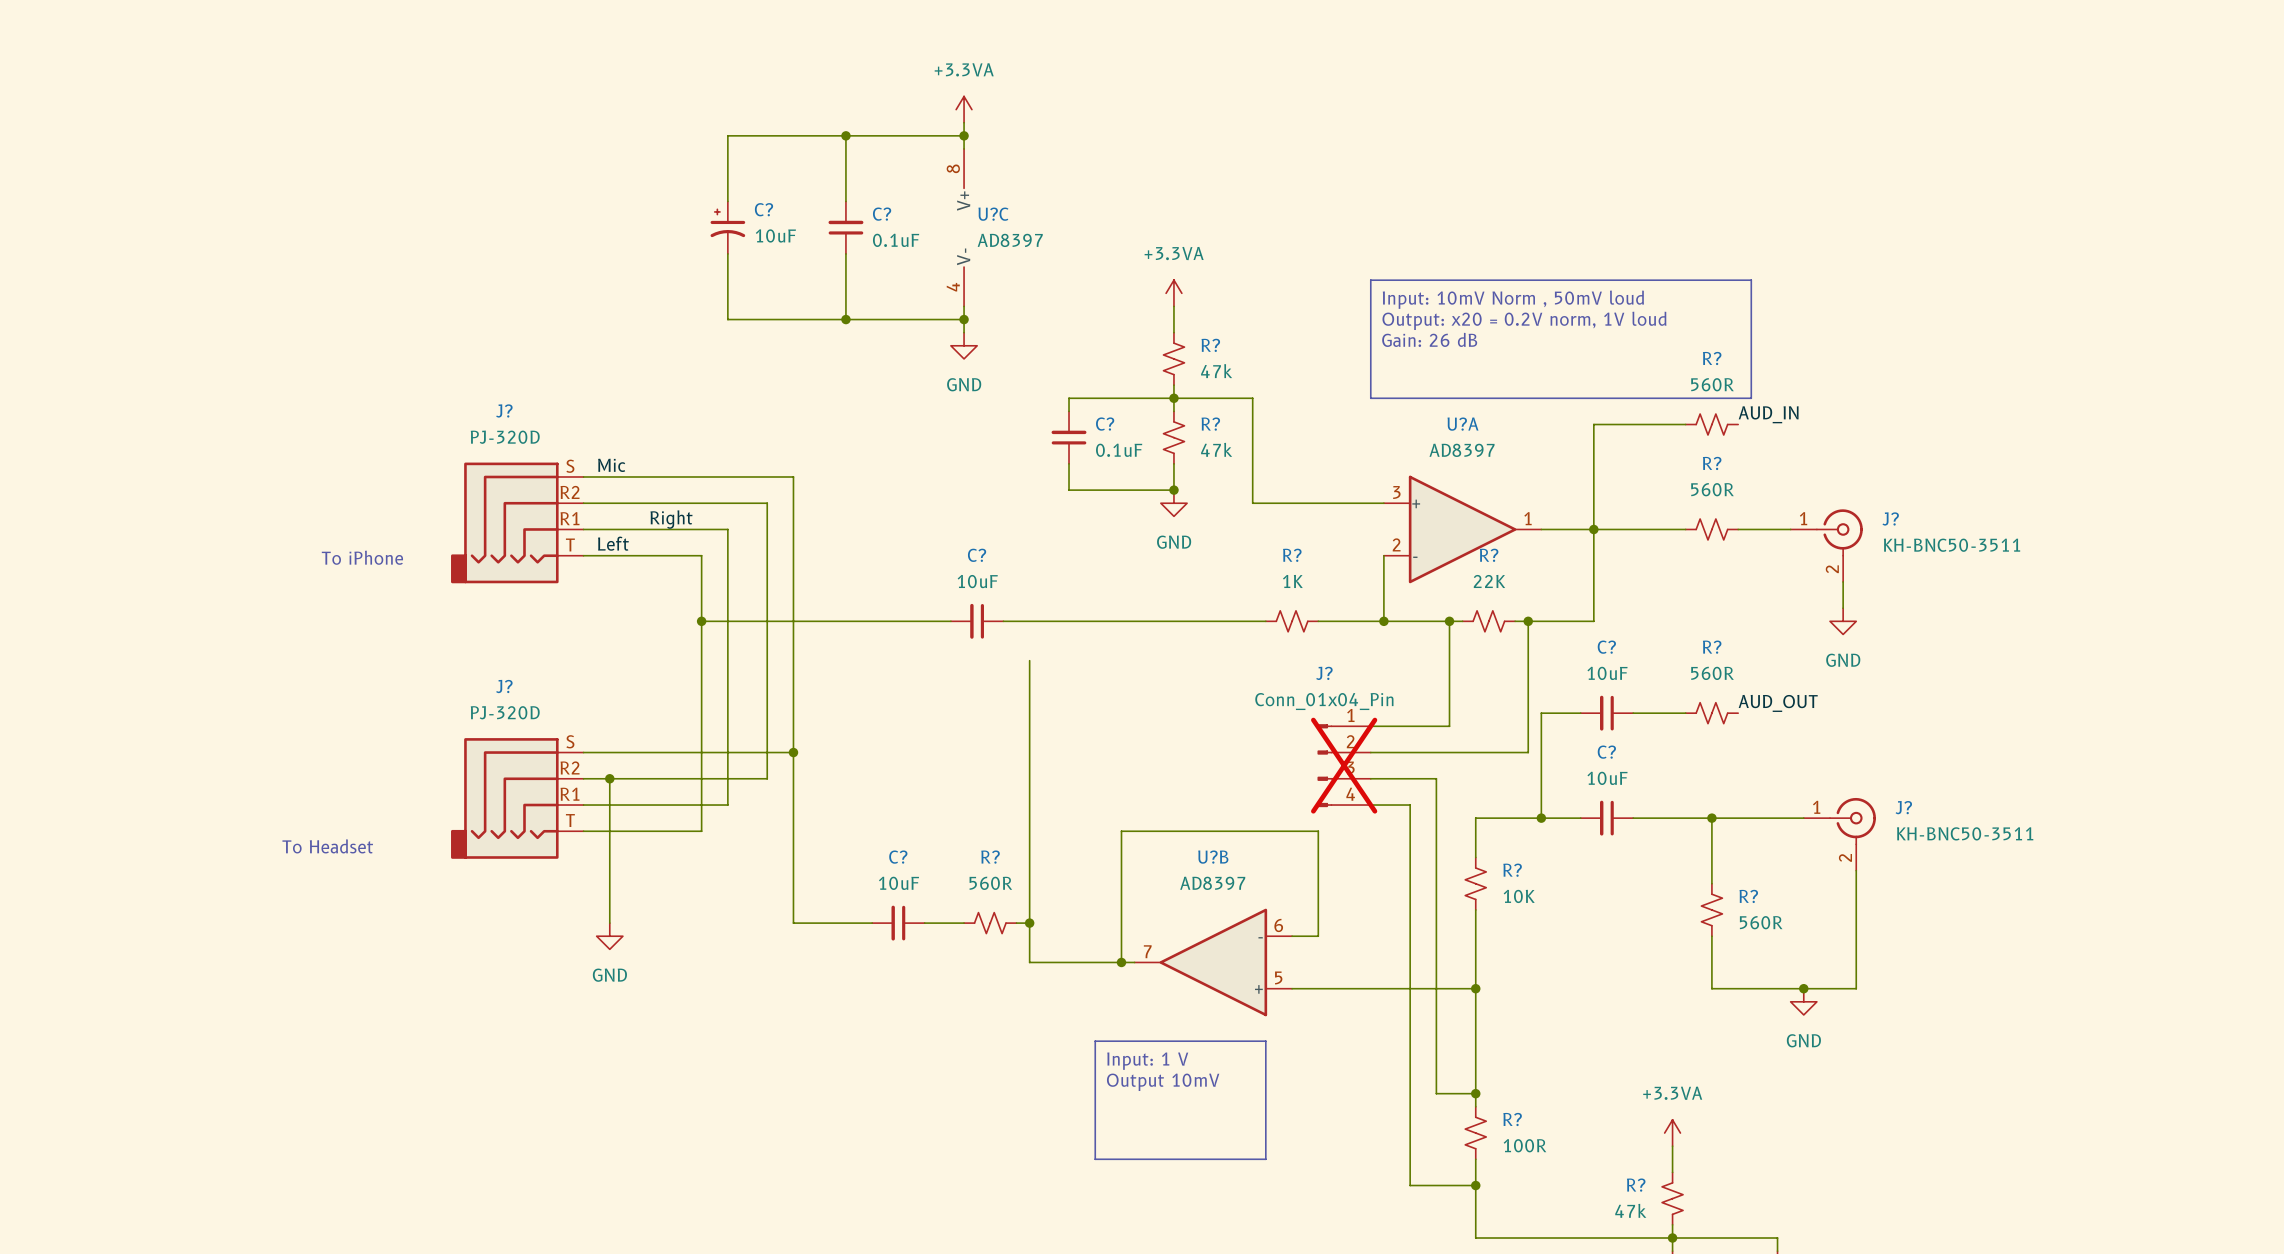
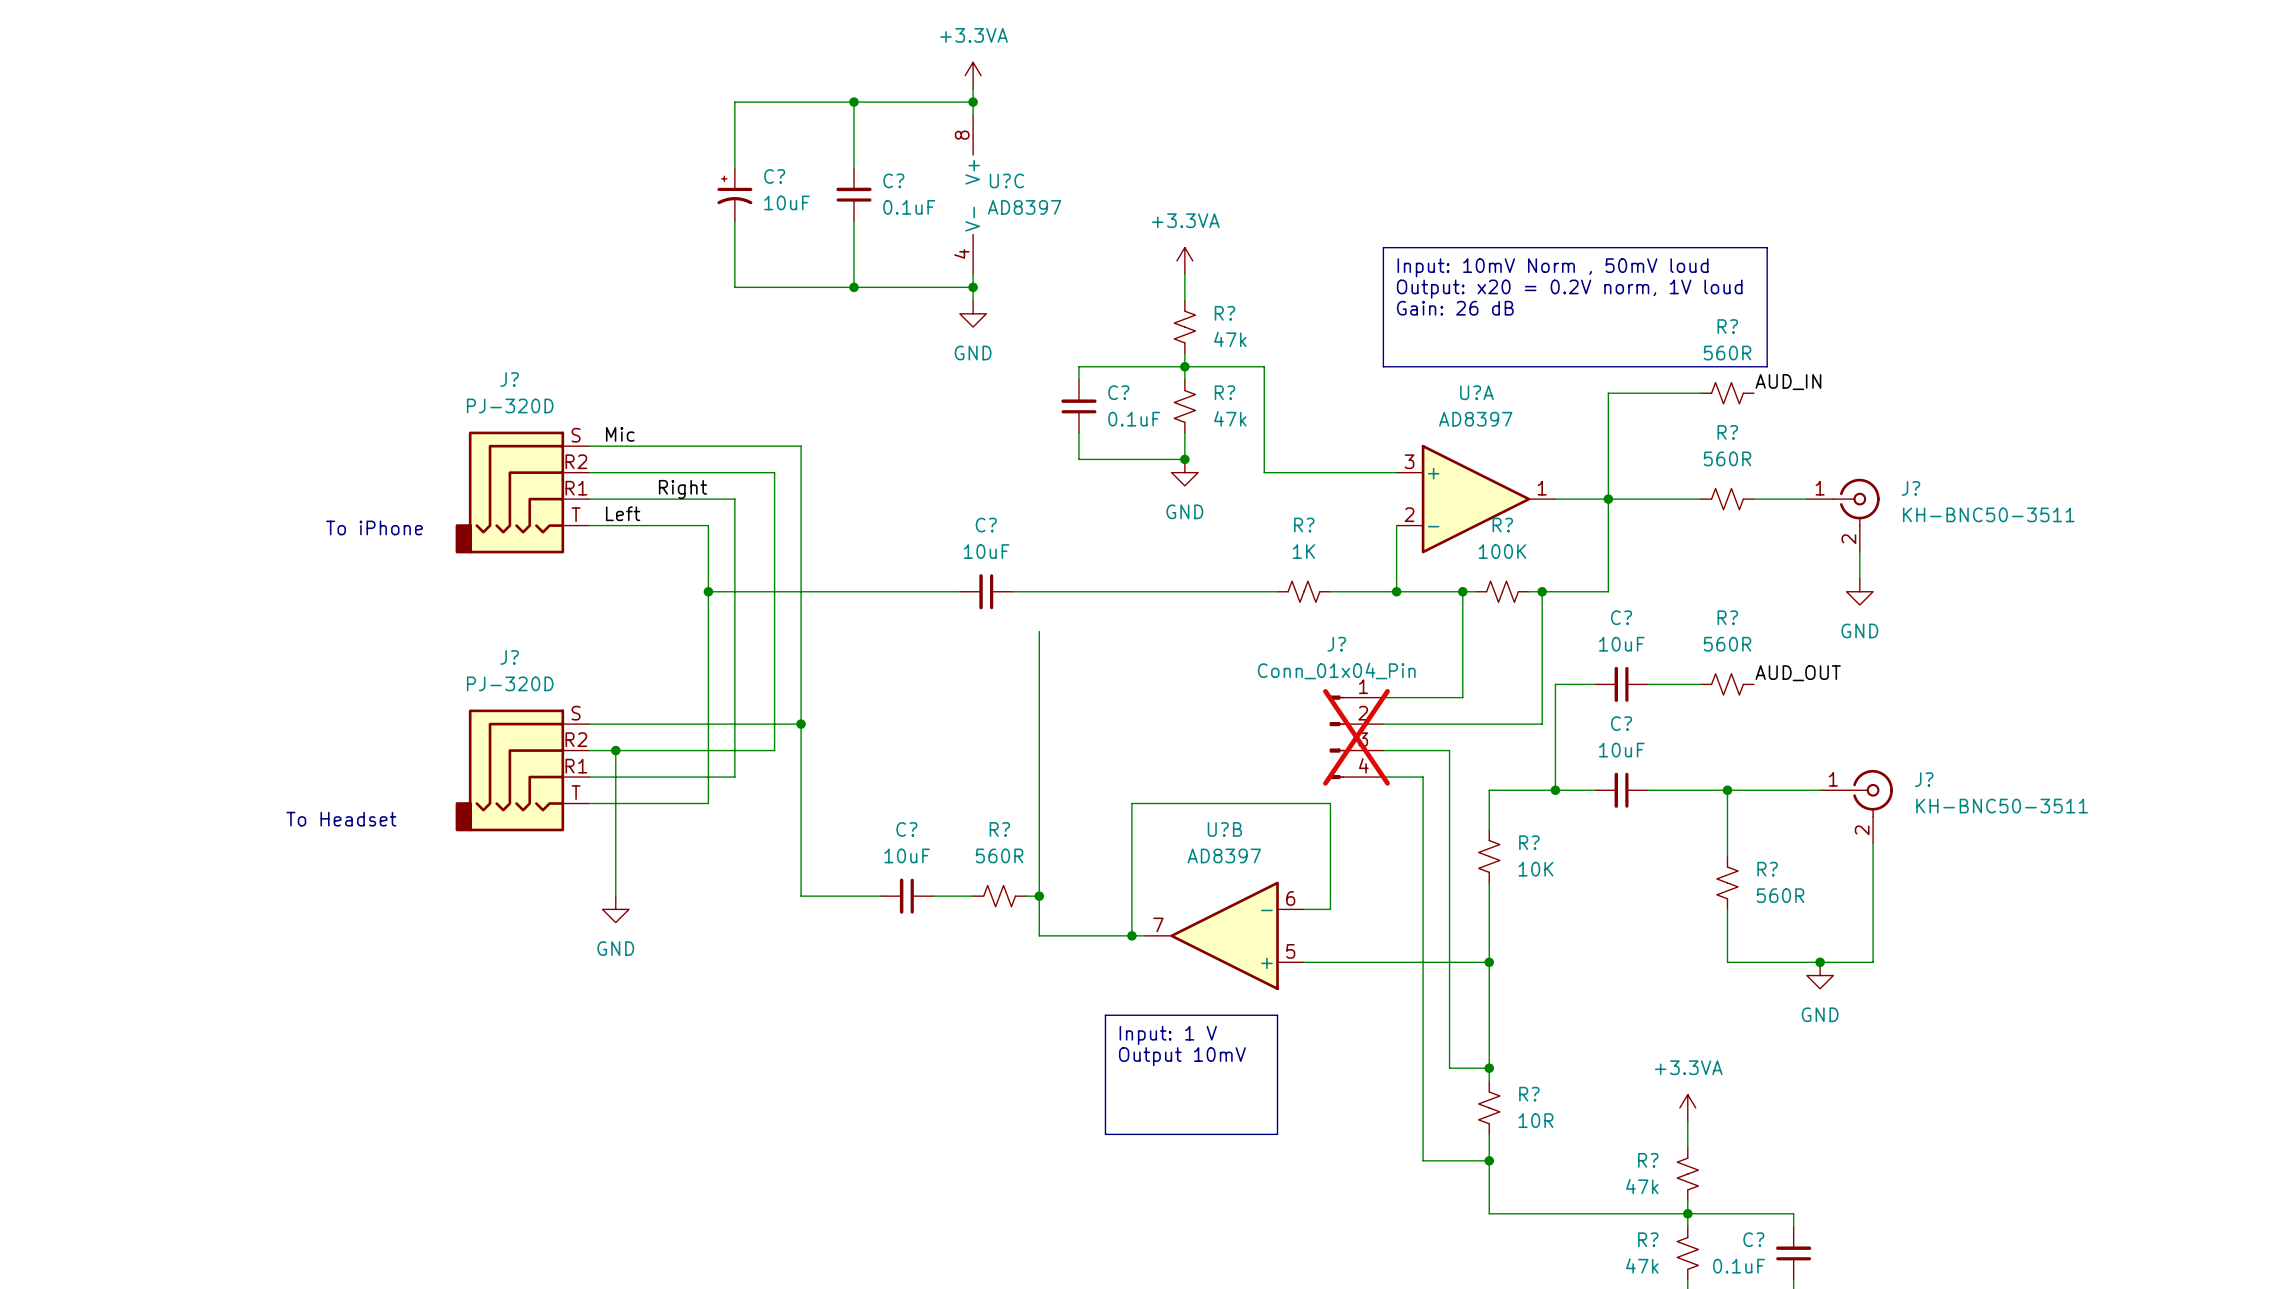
R? value: 22K (1489, 581) -> 100K (1502, 551)
R? value: 100R (1524, 1145) -> 10R (1535, 1120)

